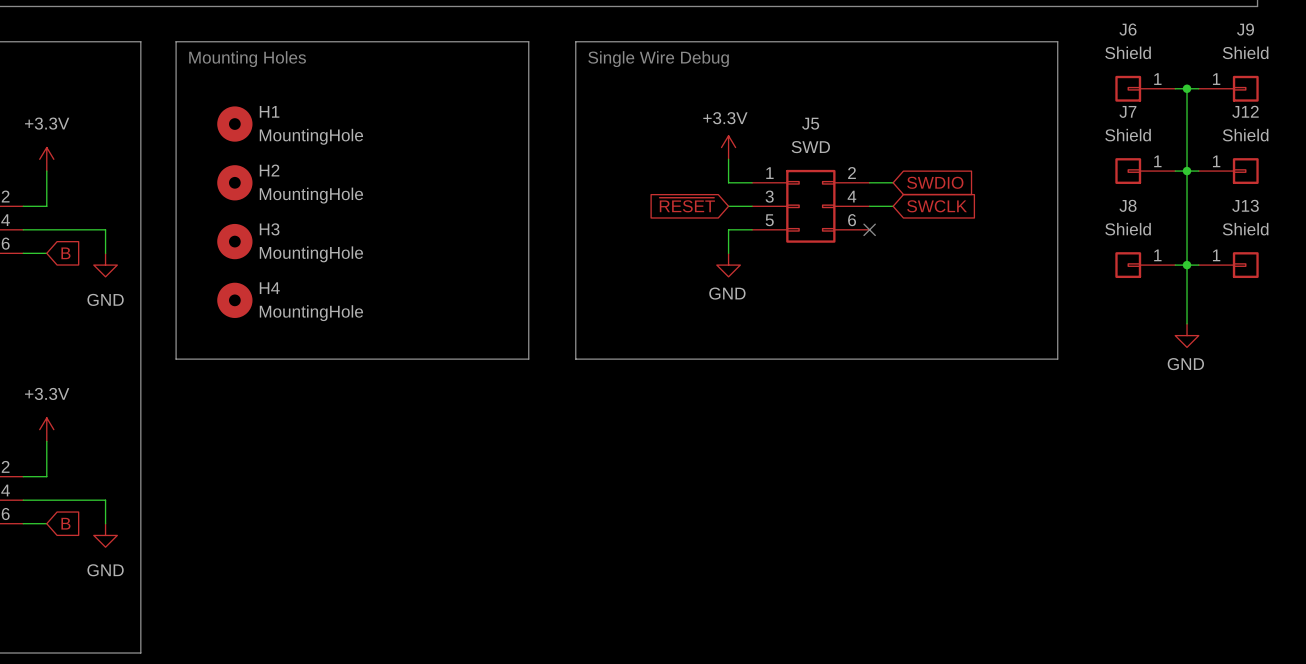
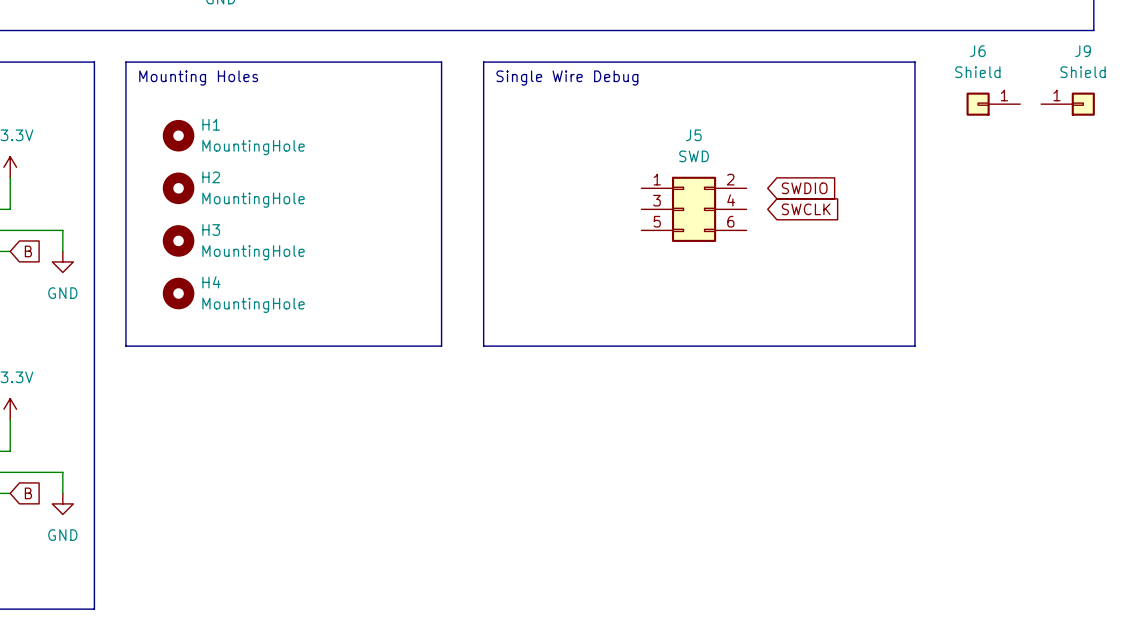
wire: (1175, 88) (1198, 88) -> none
wire: (1187, 88) (1187, 323) -> none
junction: (1187, 88) -> none
power symbol: +3.3V (728, 147) -> none
wire: (728, 159) (728, 182) (752, 182) -> none
J7: Shield (1145, 171) -> none
wire: (1175, 171) (1198, 171) -> none
junction: (1187, 171) -> none
J12: Shield (1228, 171) -> none
wire: (869, 182) (893, 182) -> none
global label: ~{RESET} (687, 205) -> none
wire: (728, 206) (752, 206) -> none
wire: (869, 206) (893, 206) -> none
wire: (752, 229) (728, 229) (728, 253) -> none
no-connect mark: (869, 229) -> none
power symbol: GND (728, 265) -> none
J8: Shield (1145, 265) -> none
wire: (1175, 265) (1198, 265) -> none
junction: (1187, 265) -> none
J13: Shield (1228, 265) -> none
power symbol: GND (1187, 335) -> none

